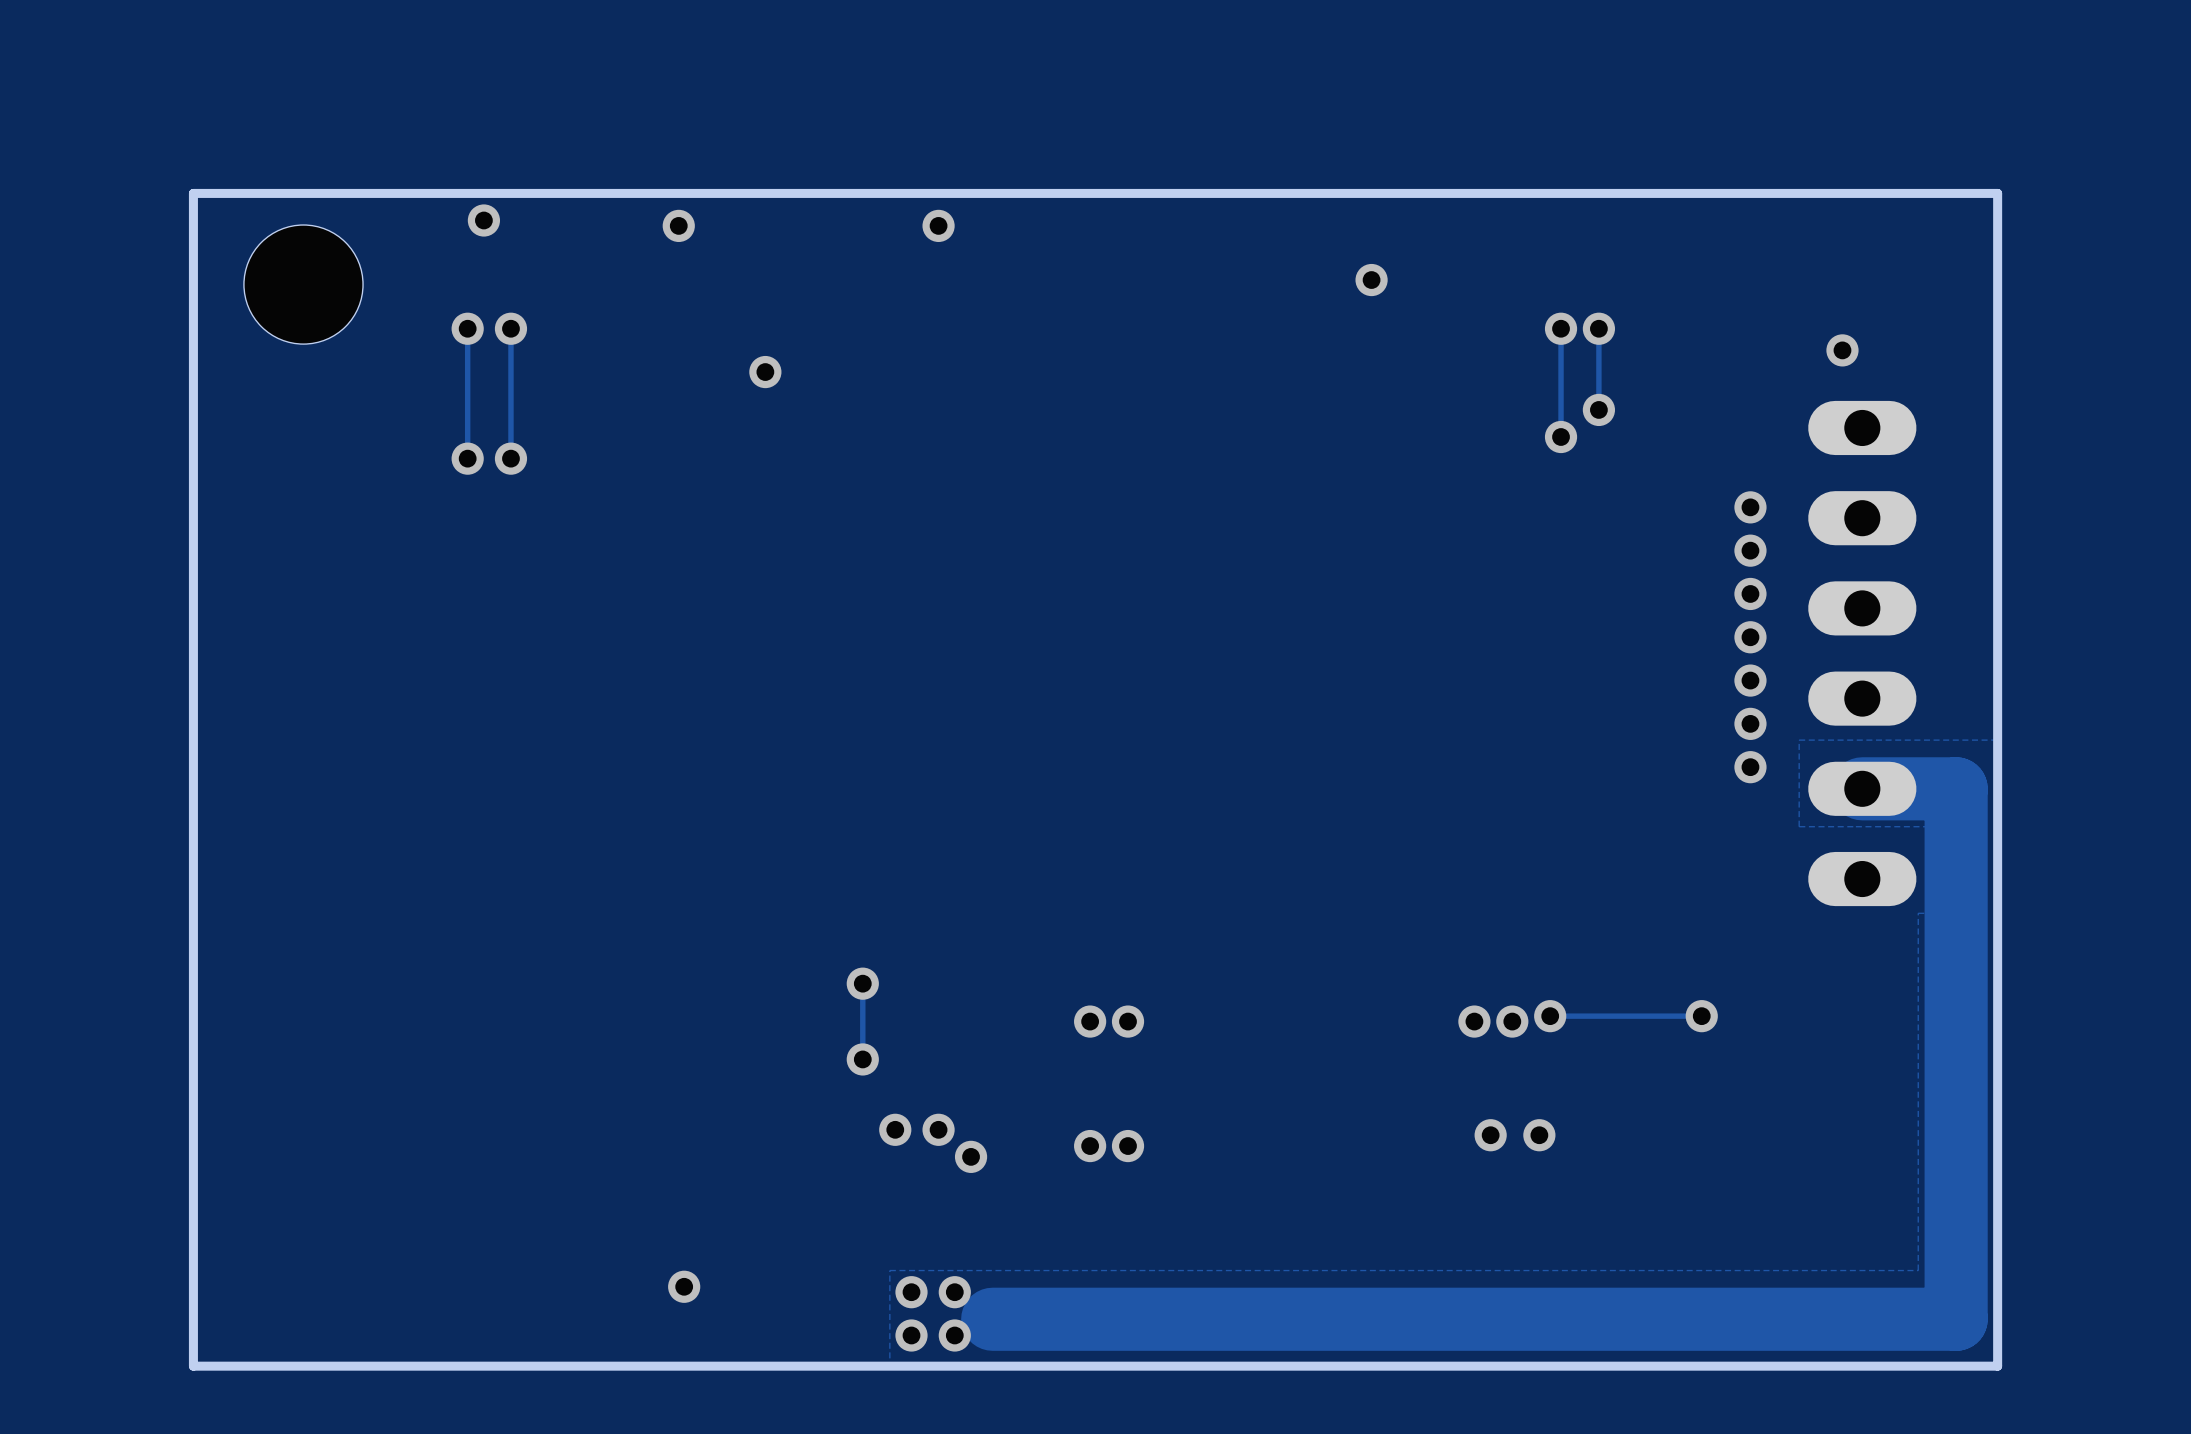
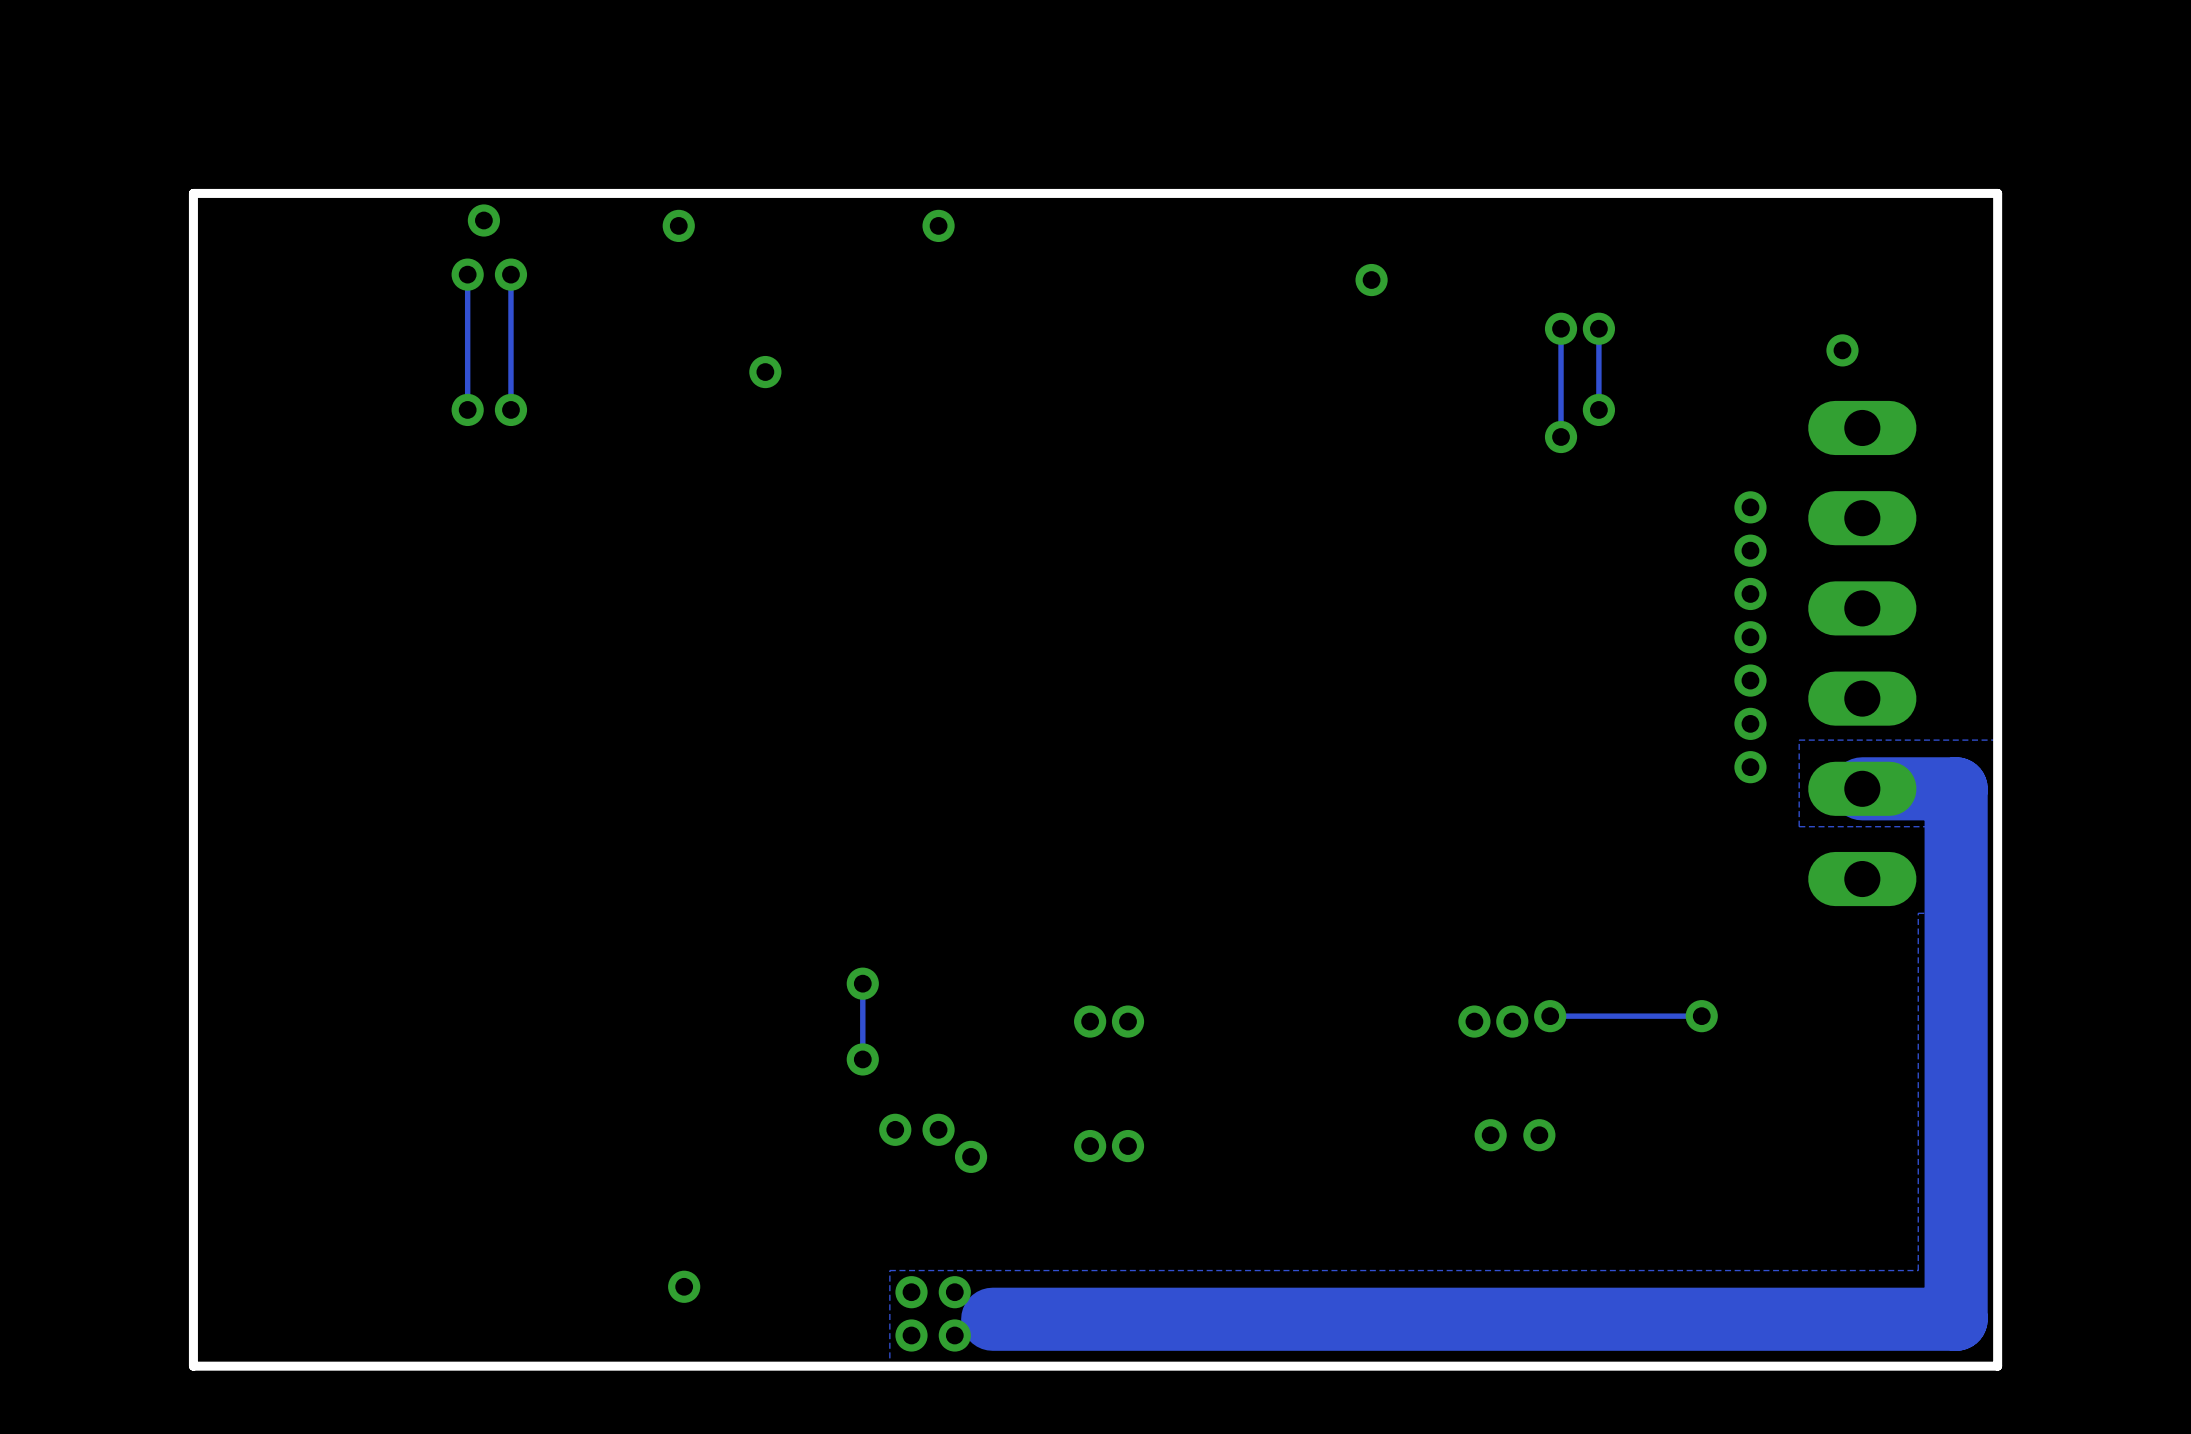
track: none -> (467, 274) (467, 328)
via: none -> (467, 274)
track: none -> (510, 274) (510, 328)
via: none -> (510, 274)
hole: (303, 284) -> none
via: (467, 328) -> none
via: (510, 328) -> none
track: (467, 409) (467, 458) -> none
via: none -> (467, 409)
track: (510, 409) (510, 458) -> none
via: none -> (510, 409)
via: (467, 458) -> none
via: (510, 458) -> none

